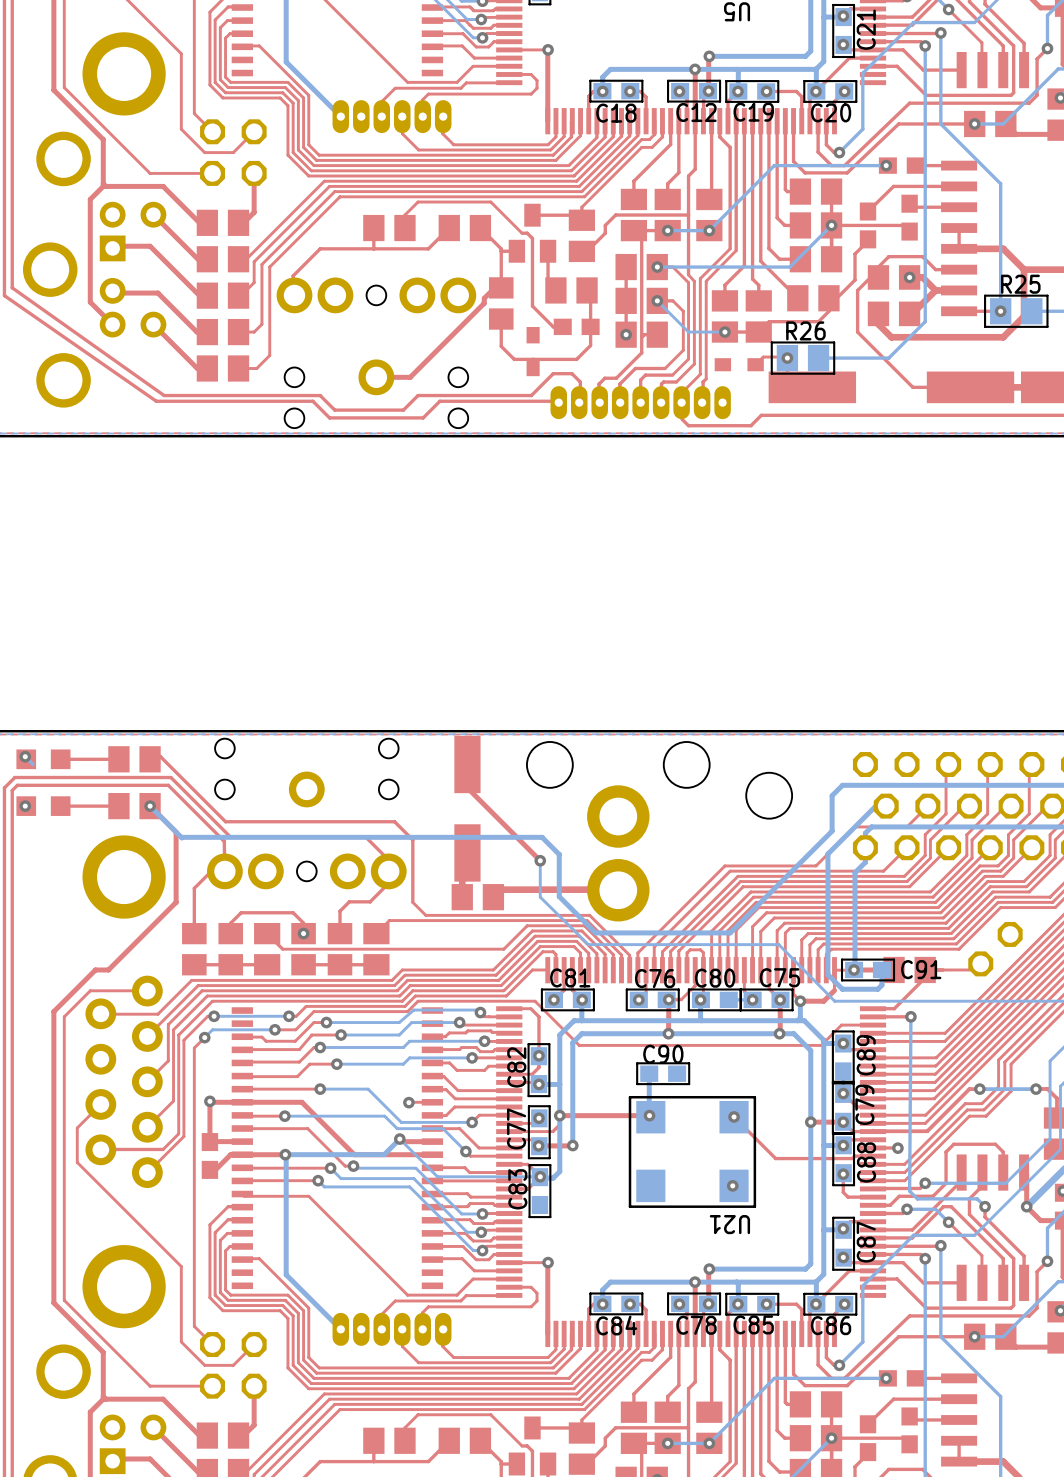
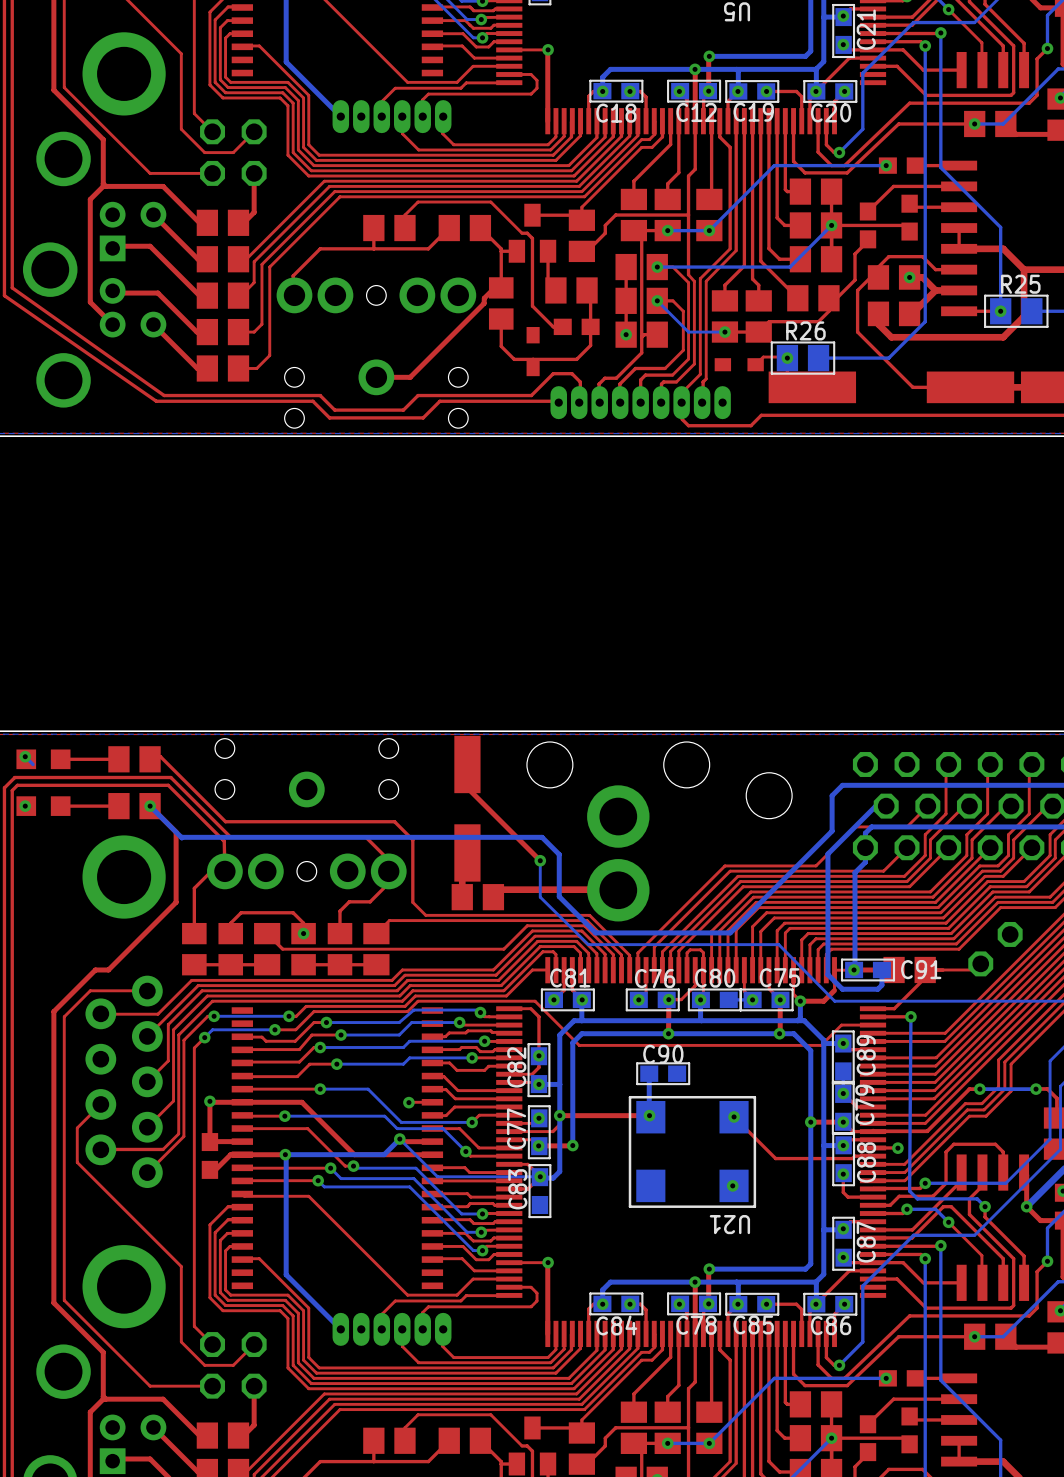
bottom track: (940, 123) (1000, 183) (1000, 227) -> (940, 123) (940, 167) (1000, 227)
bottom track: (940, 1336) (1000, 1396) (1000, 1440) -> (940, 1336) (940, 1380) (1000, 1440)

